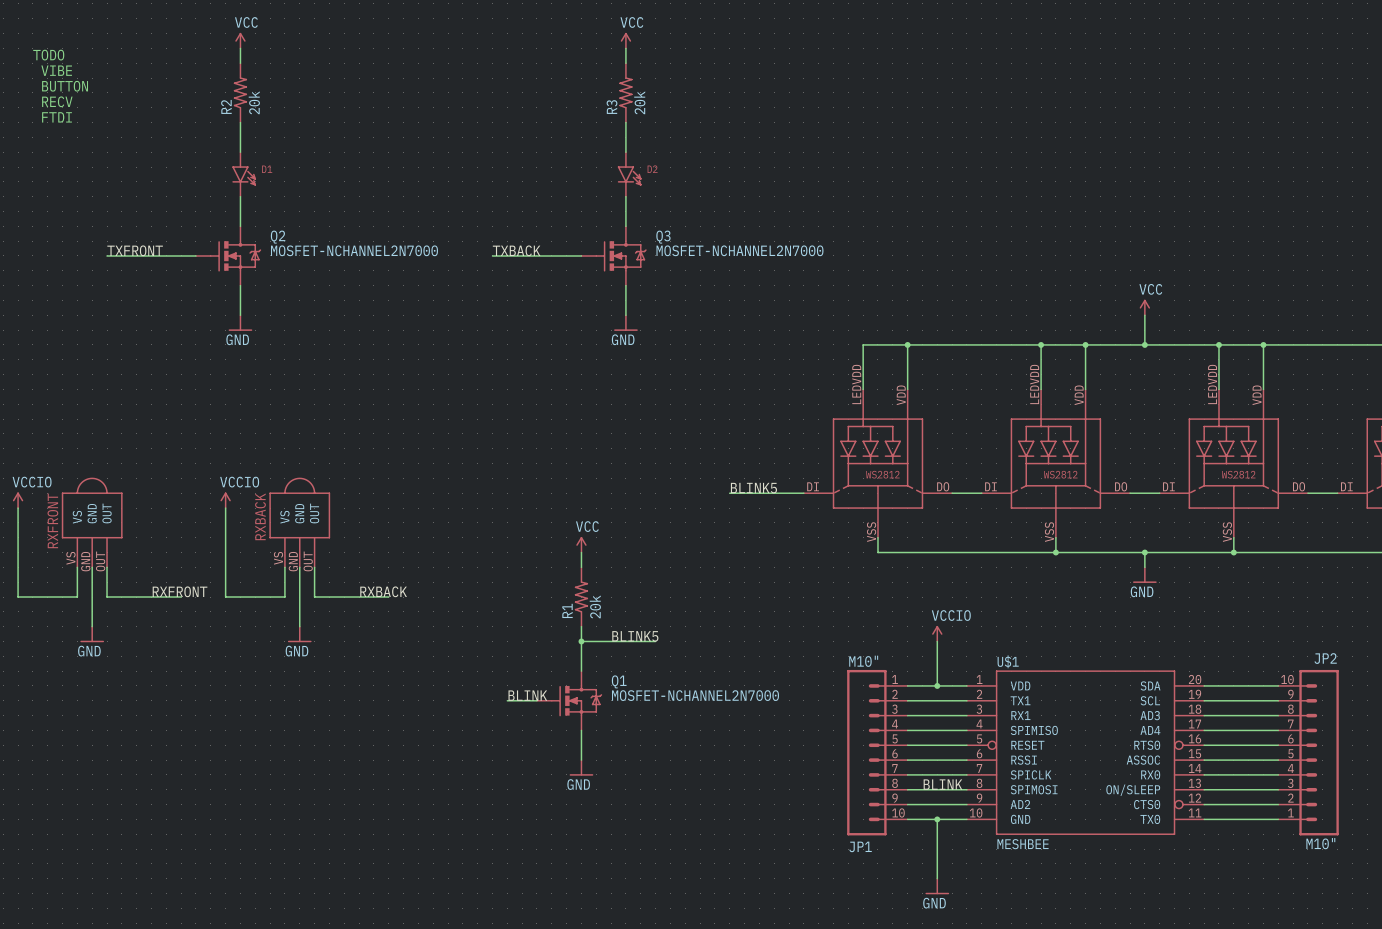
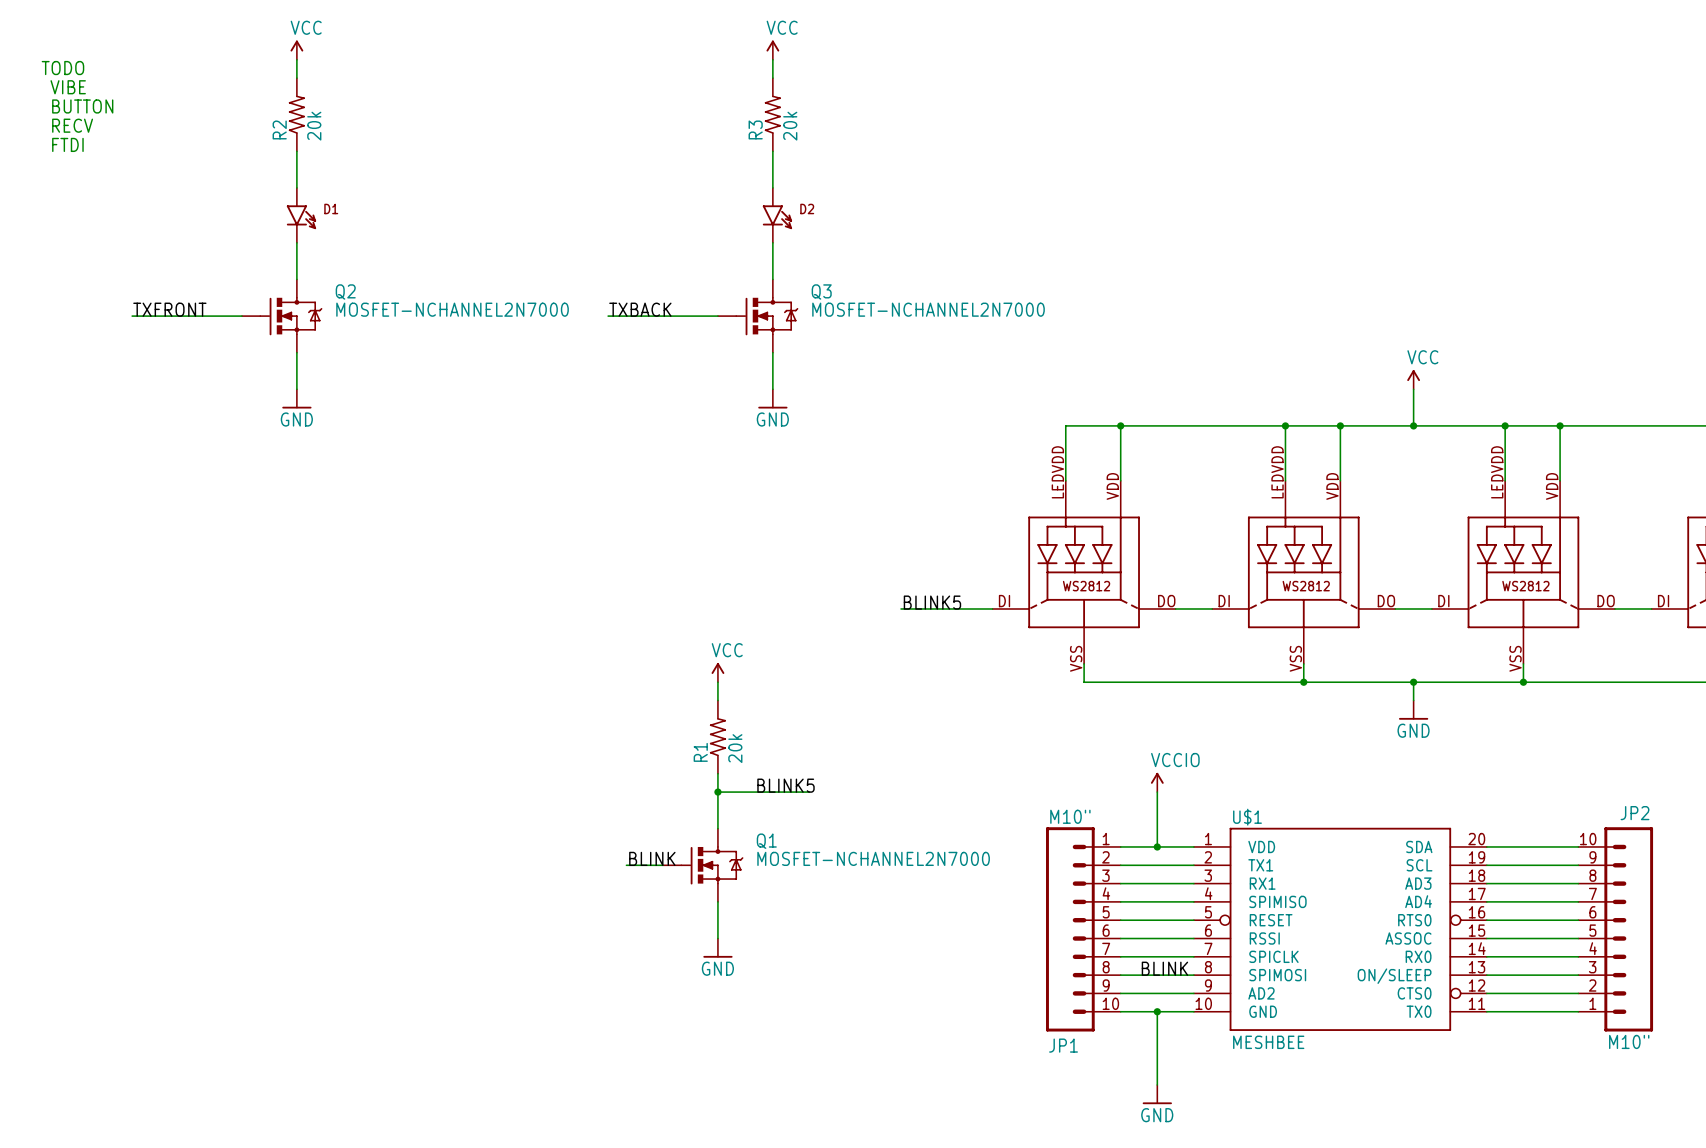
power symbol: VCCIO (18, 500) -> none
power symbol: VCCIO (225, 500) -> none
wire: (18, 508) (18, 597) (77, 597) (77, 567) -> none
wire: (225, 508) (225, 597) (284, 597) (284, 567) -> none
RXFRONT: (92, 522) -> none
RXBACK: (299, 522) -> none
wire: (92, 567) (92, 626) -> none
wire: (107, 567) (107, 597) (181, 597) -> none
wire: (299, 567) (299, 626) -> none
wire: (314, 567) (314, 597) (388, 597) -> none
label: RXFRONT (180, 591) -> none
label: RXBACK (383, 591) -> none
power symbol: GND (92, 634) -> none
power symbol: GND (299, 634) -> none

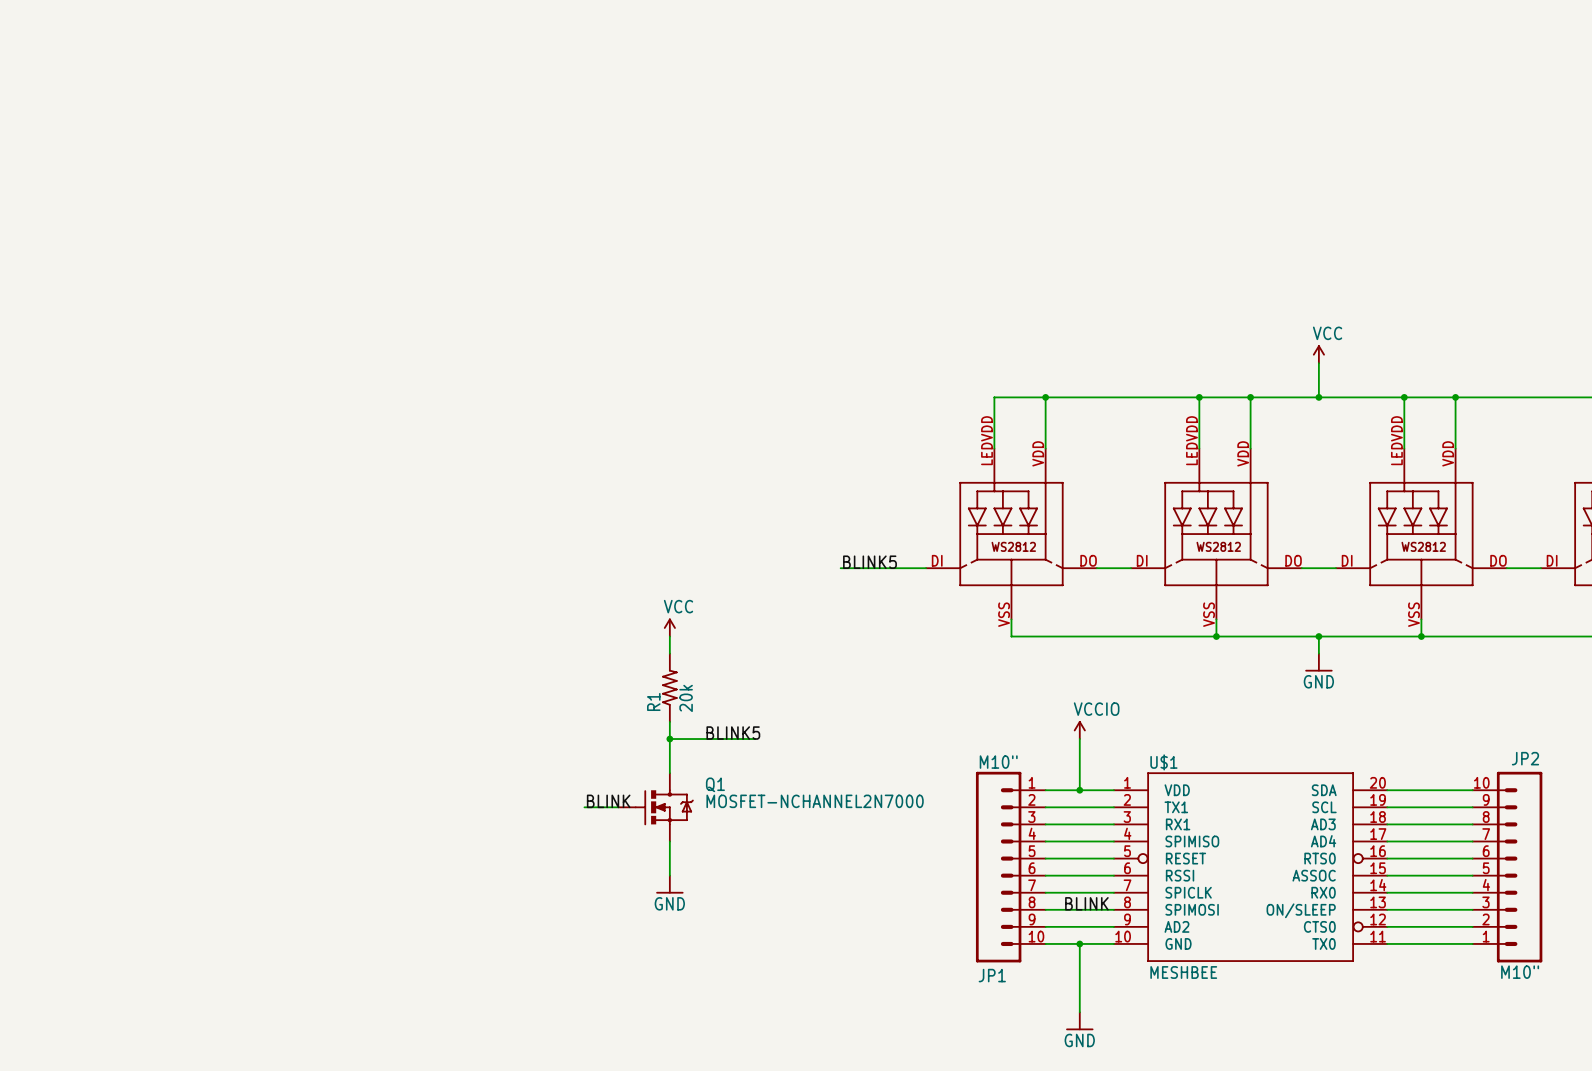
power symbol: VCC (296, 50) -> none
power symbol: VCC (772, 50) -> none
wire: (296, 59) (296, 78) -> none
wire: (772, 59) (772, 78) -> none
text: TODO (62, 68) -> none
text: VIBE (68, 87) -> none
text: BUTTON (82, 106) -> none
R2: 20k (296, 114) -> none
R3: 20k (772, 114) -> none
text: RECV (72, 125) -> none
text: FTDI (67, 144) -> none
wire: (296, 151) (296, 187) -> none
wire: (772, 151) (772, 187) -> none
D1: (301, 215) -> none
D2: (777, 215) -> none
wire: (296, 242) (296, 279) -> none
wire: (772, 242) (772, 279) -> none
label: TXFRONT (169, 309) -> none
label: TXBACK (640, 309) -> none
wire: (132, 316) (241, 316) -> none
Q2: MOSFET-NCHANNEL2N7000 (282, 316) -> none
wire: (608, 316) (717, 316) -> none
Q3: MOSFET-NCHANNEL2N7000 (758, 316) -> none
wire: (296, 352) (296, 389) -> none
wire: (772, 352) (772, 389) -> none
power symbol: GND (296, 398) -> none
power symbol: GND (772, 398) -> none

